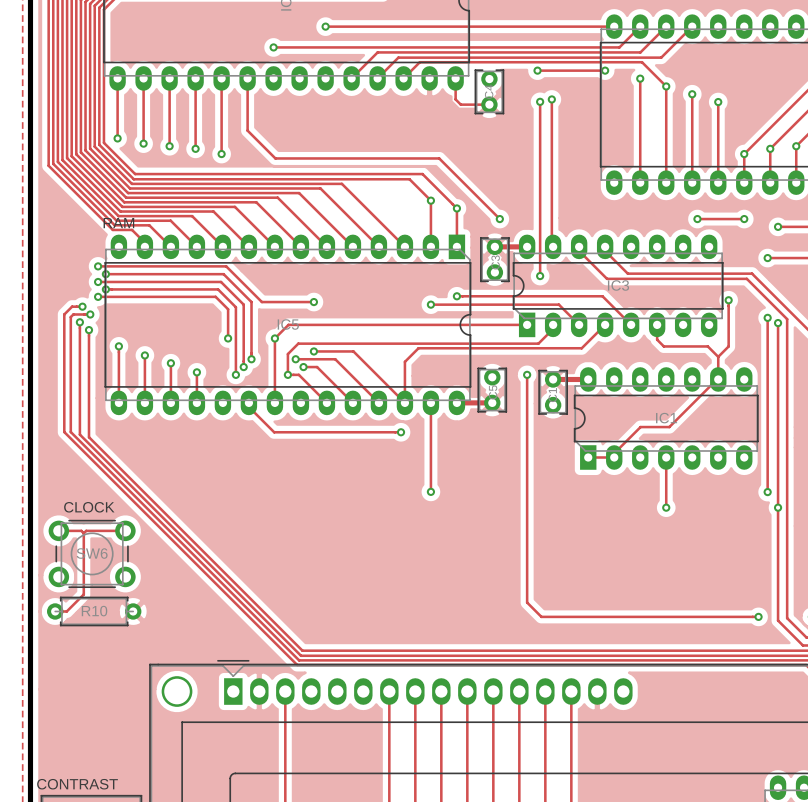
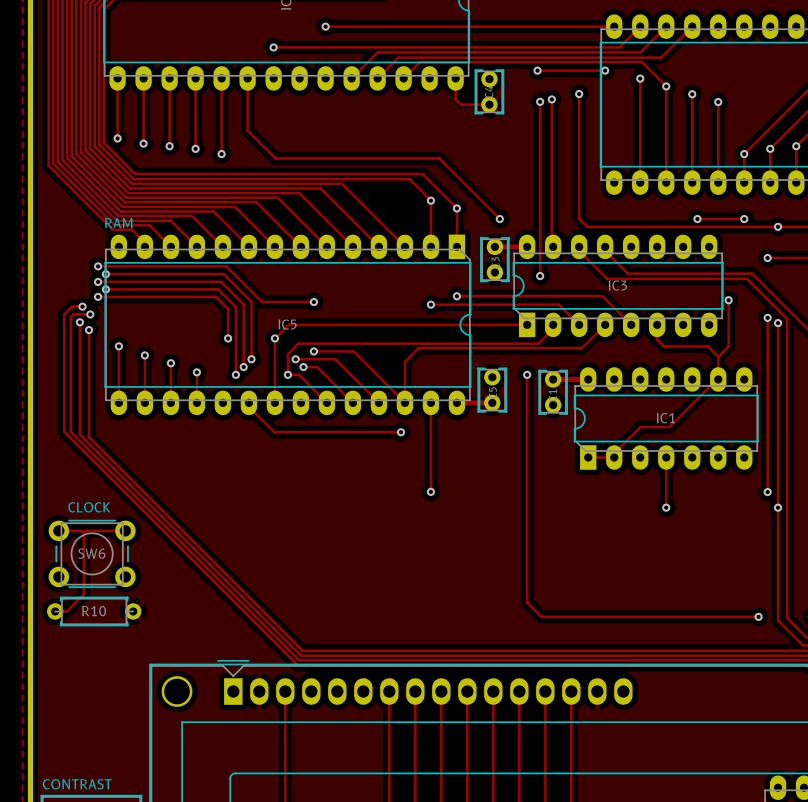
track: none -> (579, 94) (579, 218) (587, 226) (778, 226)
via: none -> (579, 94)

